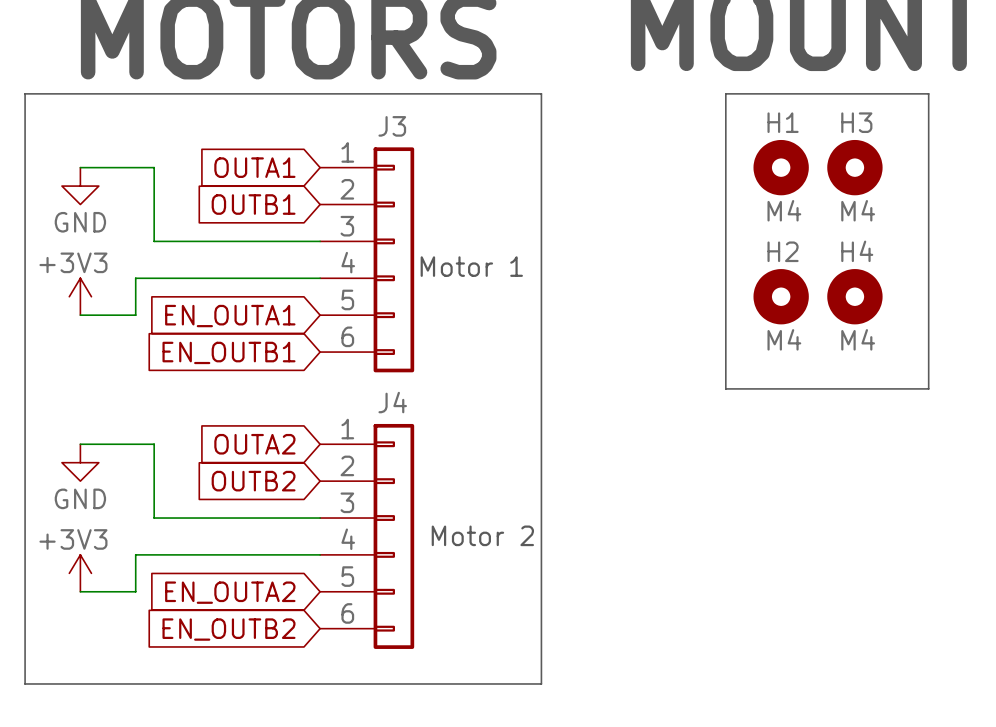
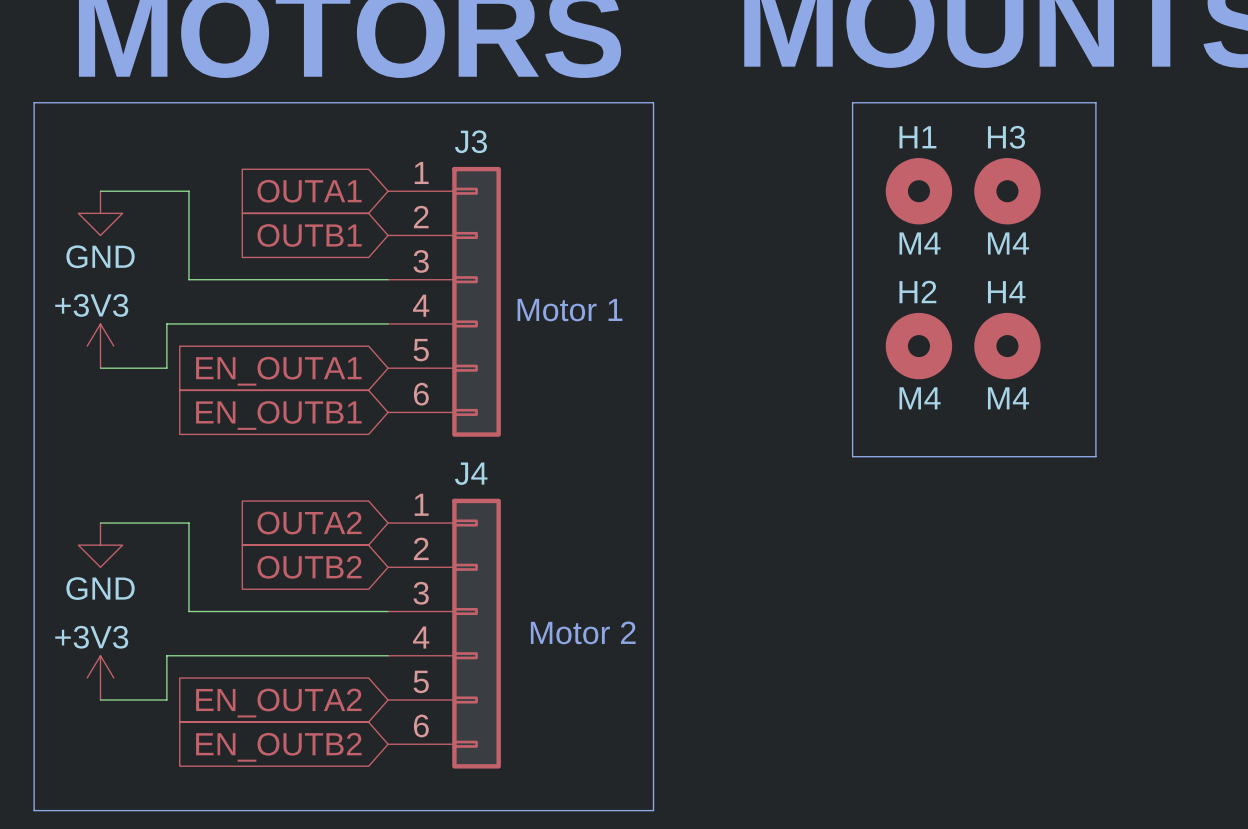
line: (725, 93) (725, 388) -> (874, 102) (852, 102) (852, 456) (874, 456)
line: (910, 93) (928, 93) (928, 388) (910, 388) -> (1095, 102) (1095, 456)
H1 position: (781, 167) -> (918, 191)
H3 position: (854, 167) -> (1007, 191)
H2 position: (781, 296) -> (918, 346)
H4 position: (854, 296) -> (1007, 346)

